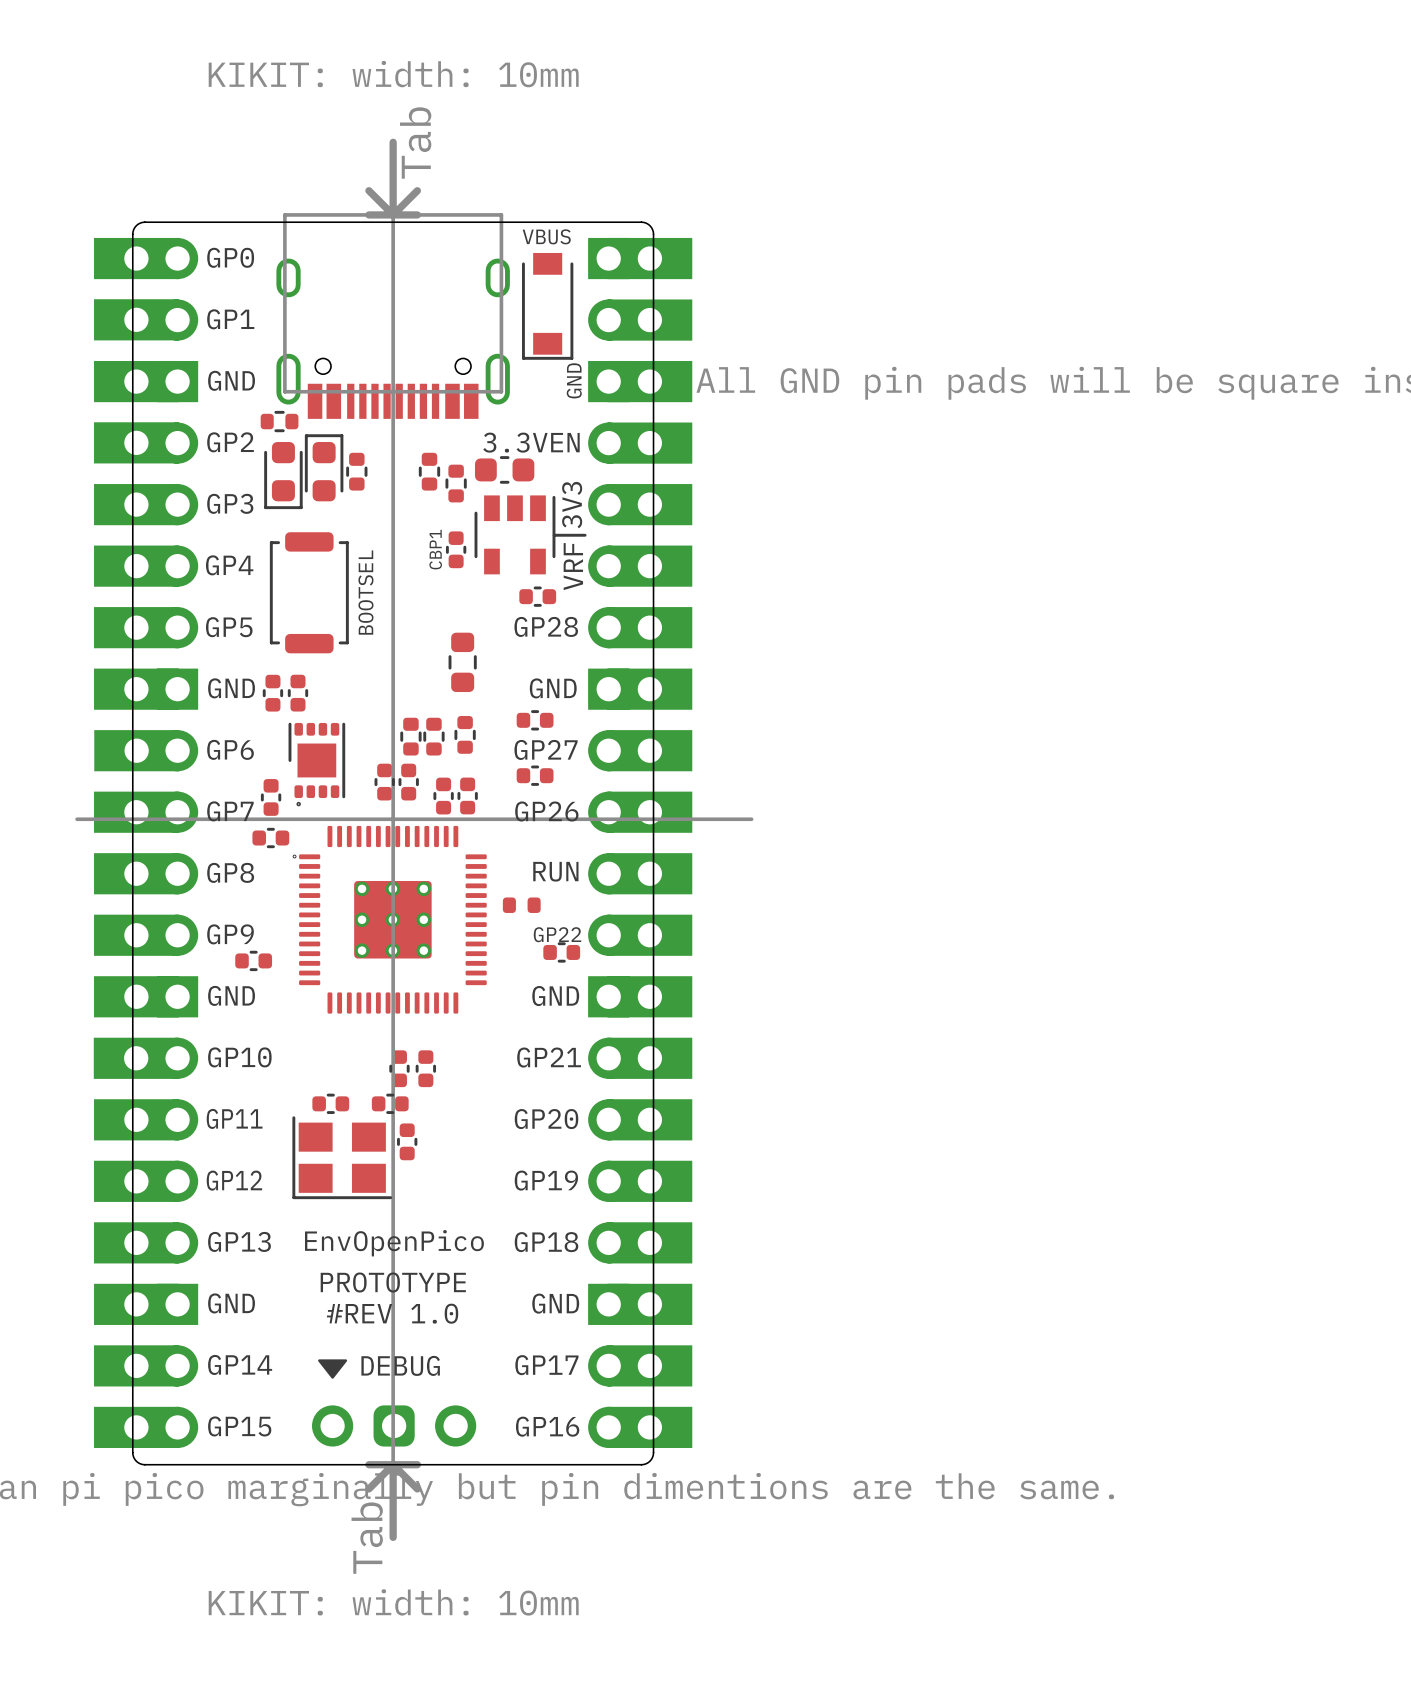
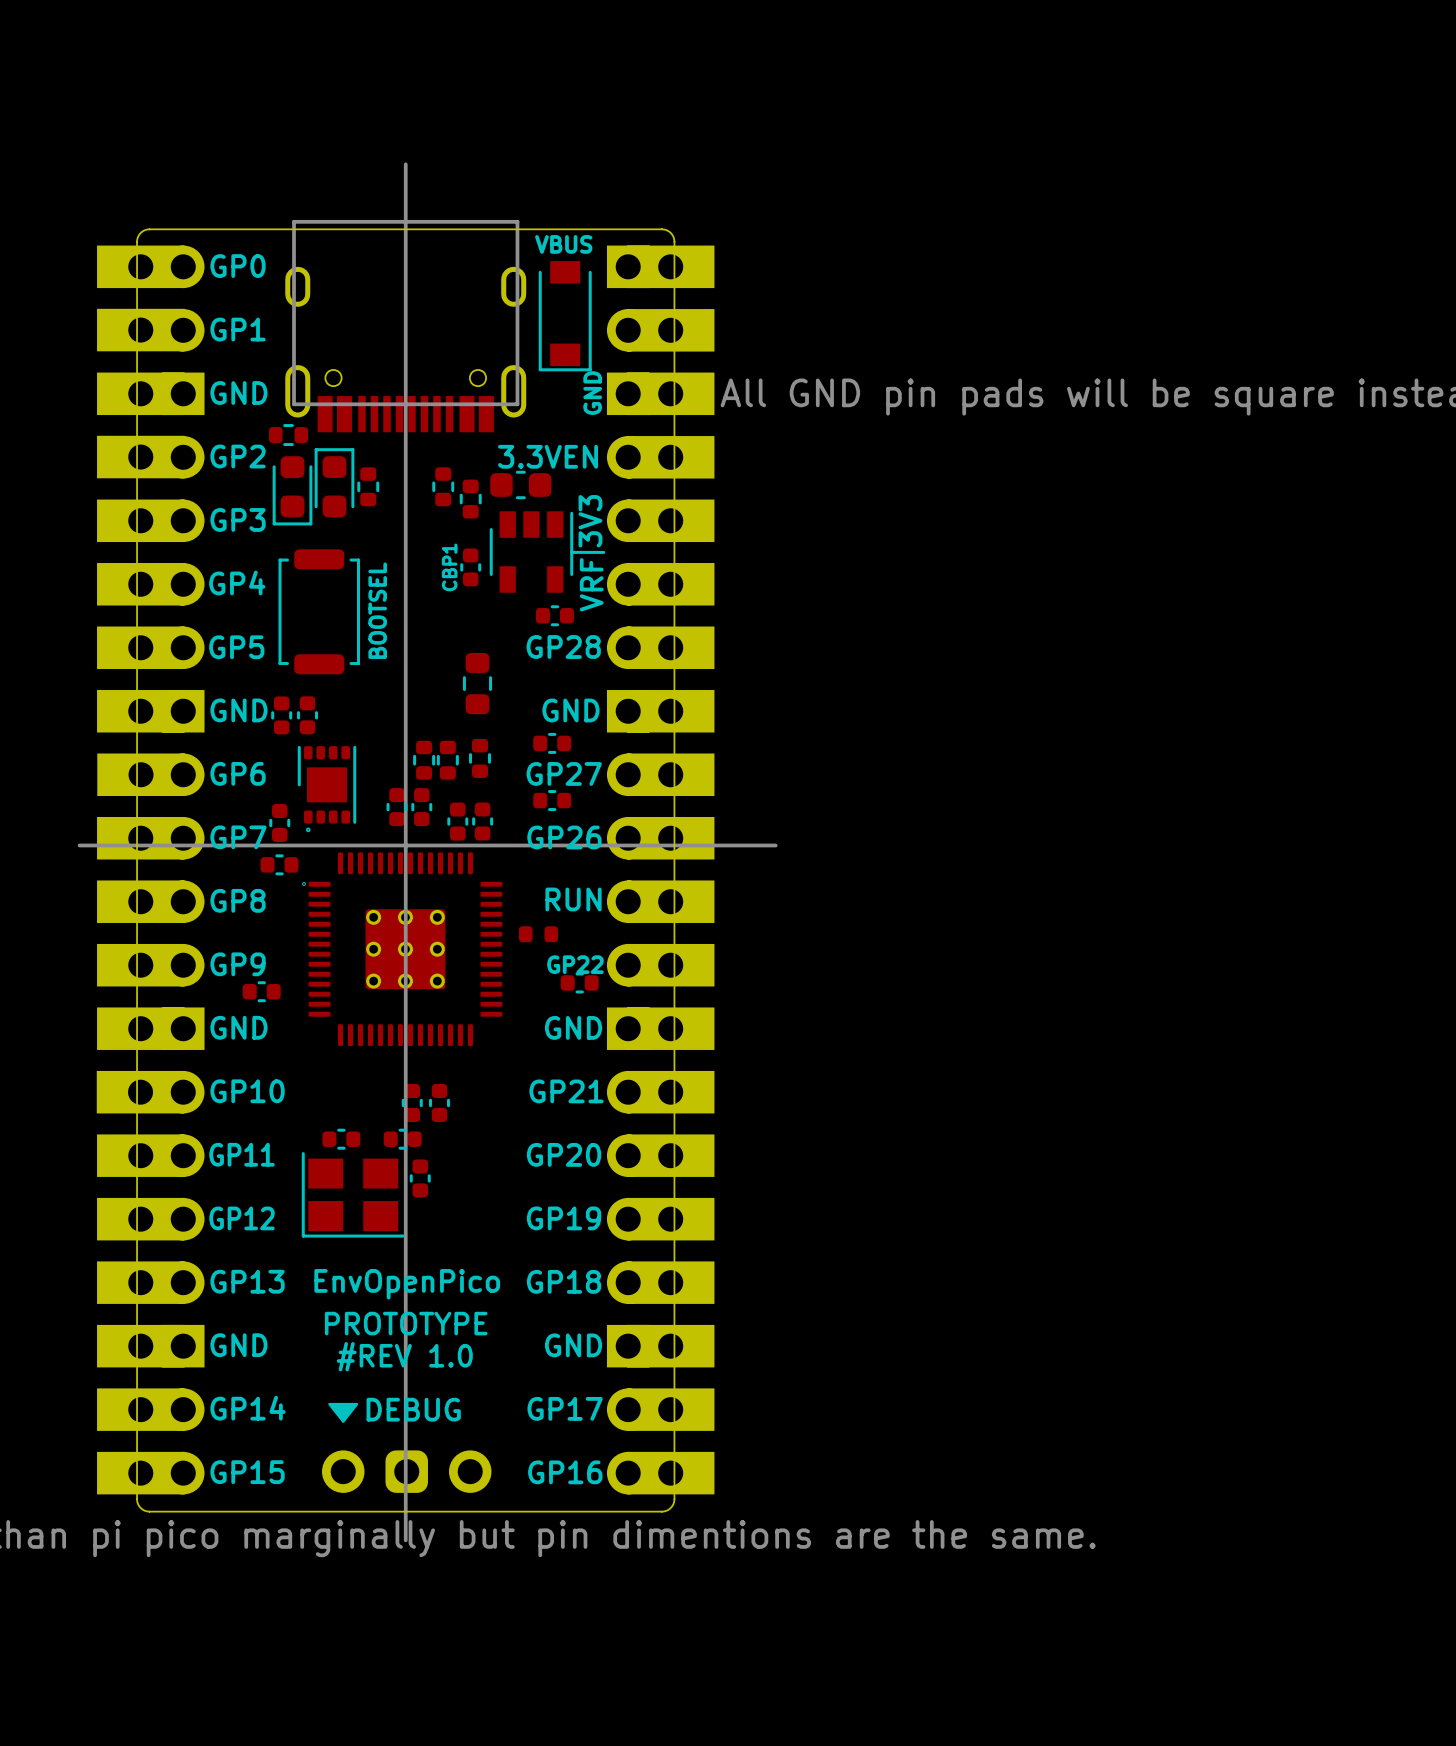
drawing: [365, 138, 422, 219] -> none
drawing: [365, 1461, 422, 1542] -> none

